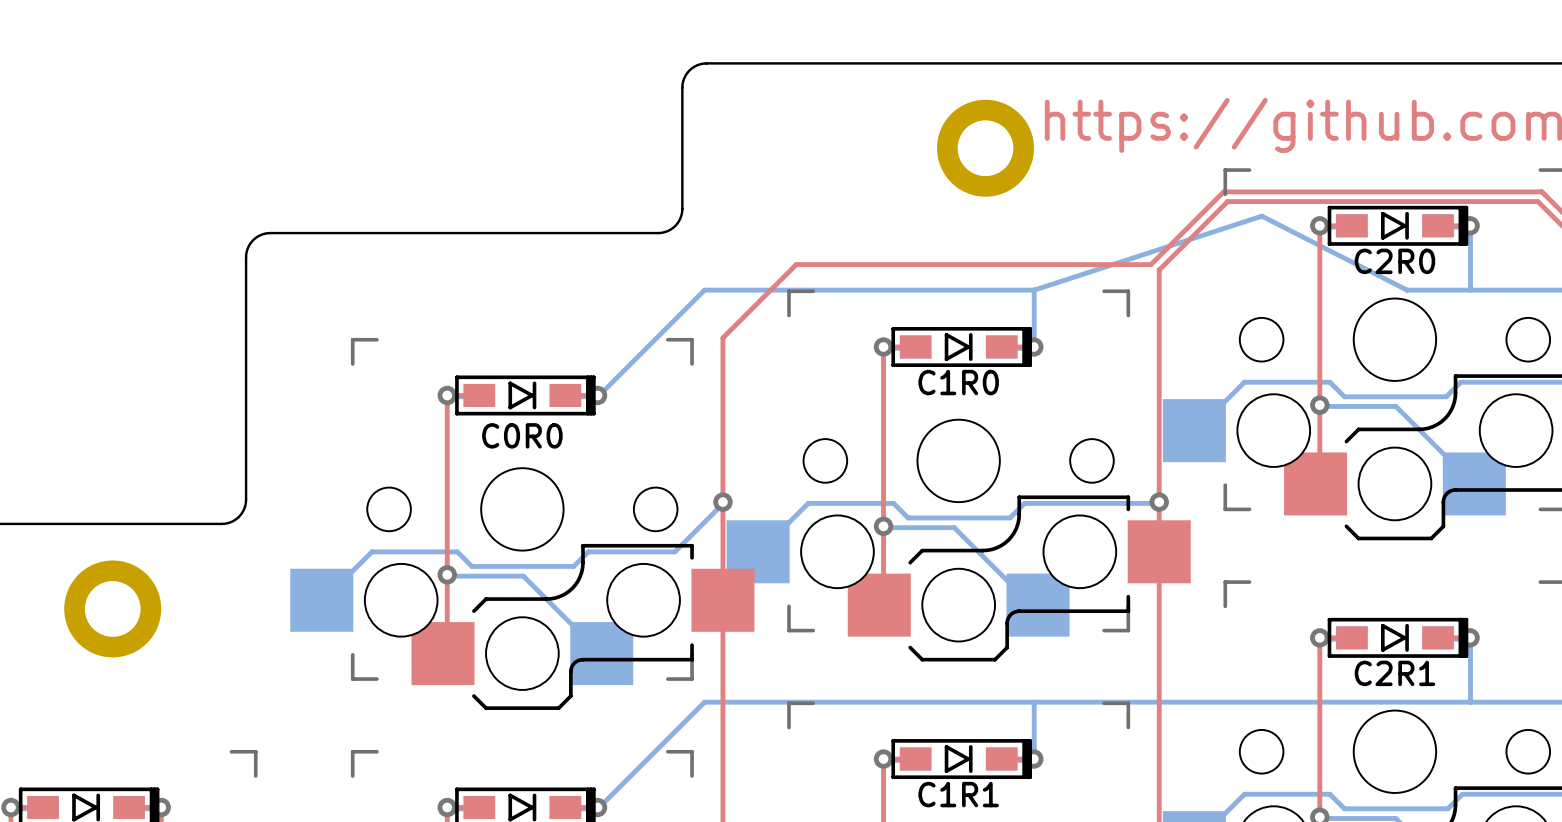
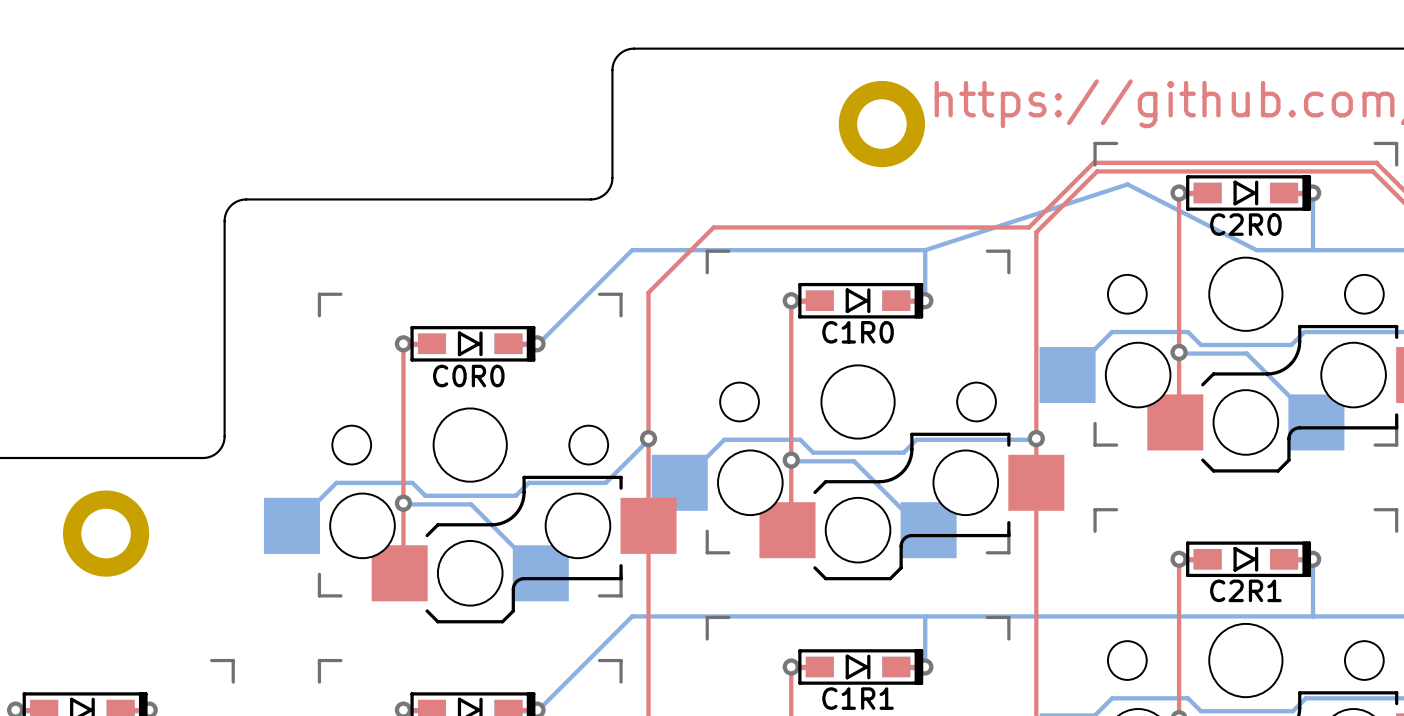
part side: bottom (525, 395) -> top (472, 343)

